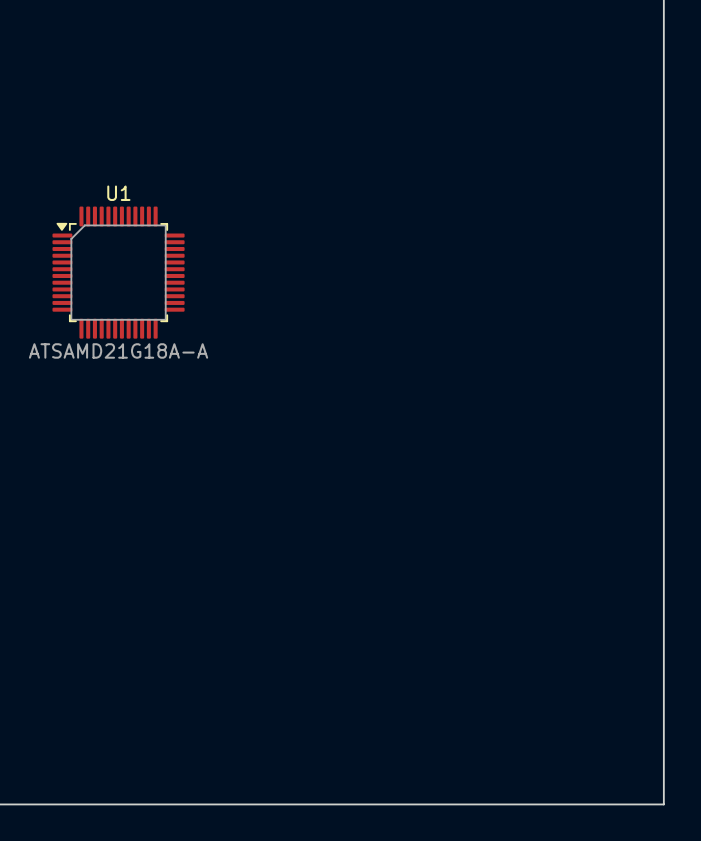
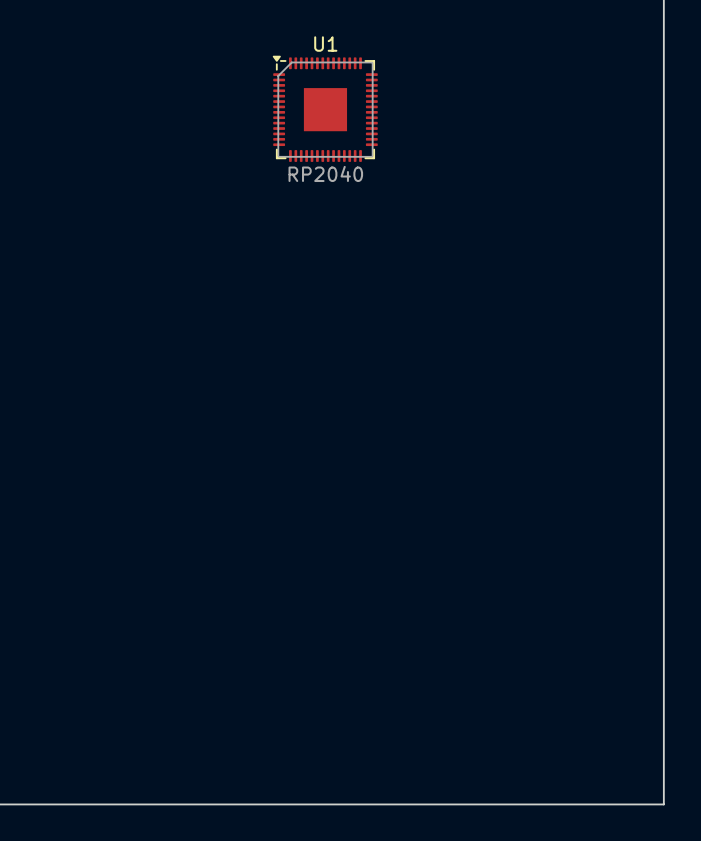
U1 footprint: [52, 206, 185, 339] -> [272, 55, 378, 162]
U1 value: ATSAMD21G18A-A (118, 350) -> RP2040 (325, 173)

